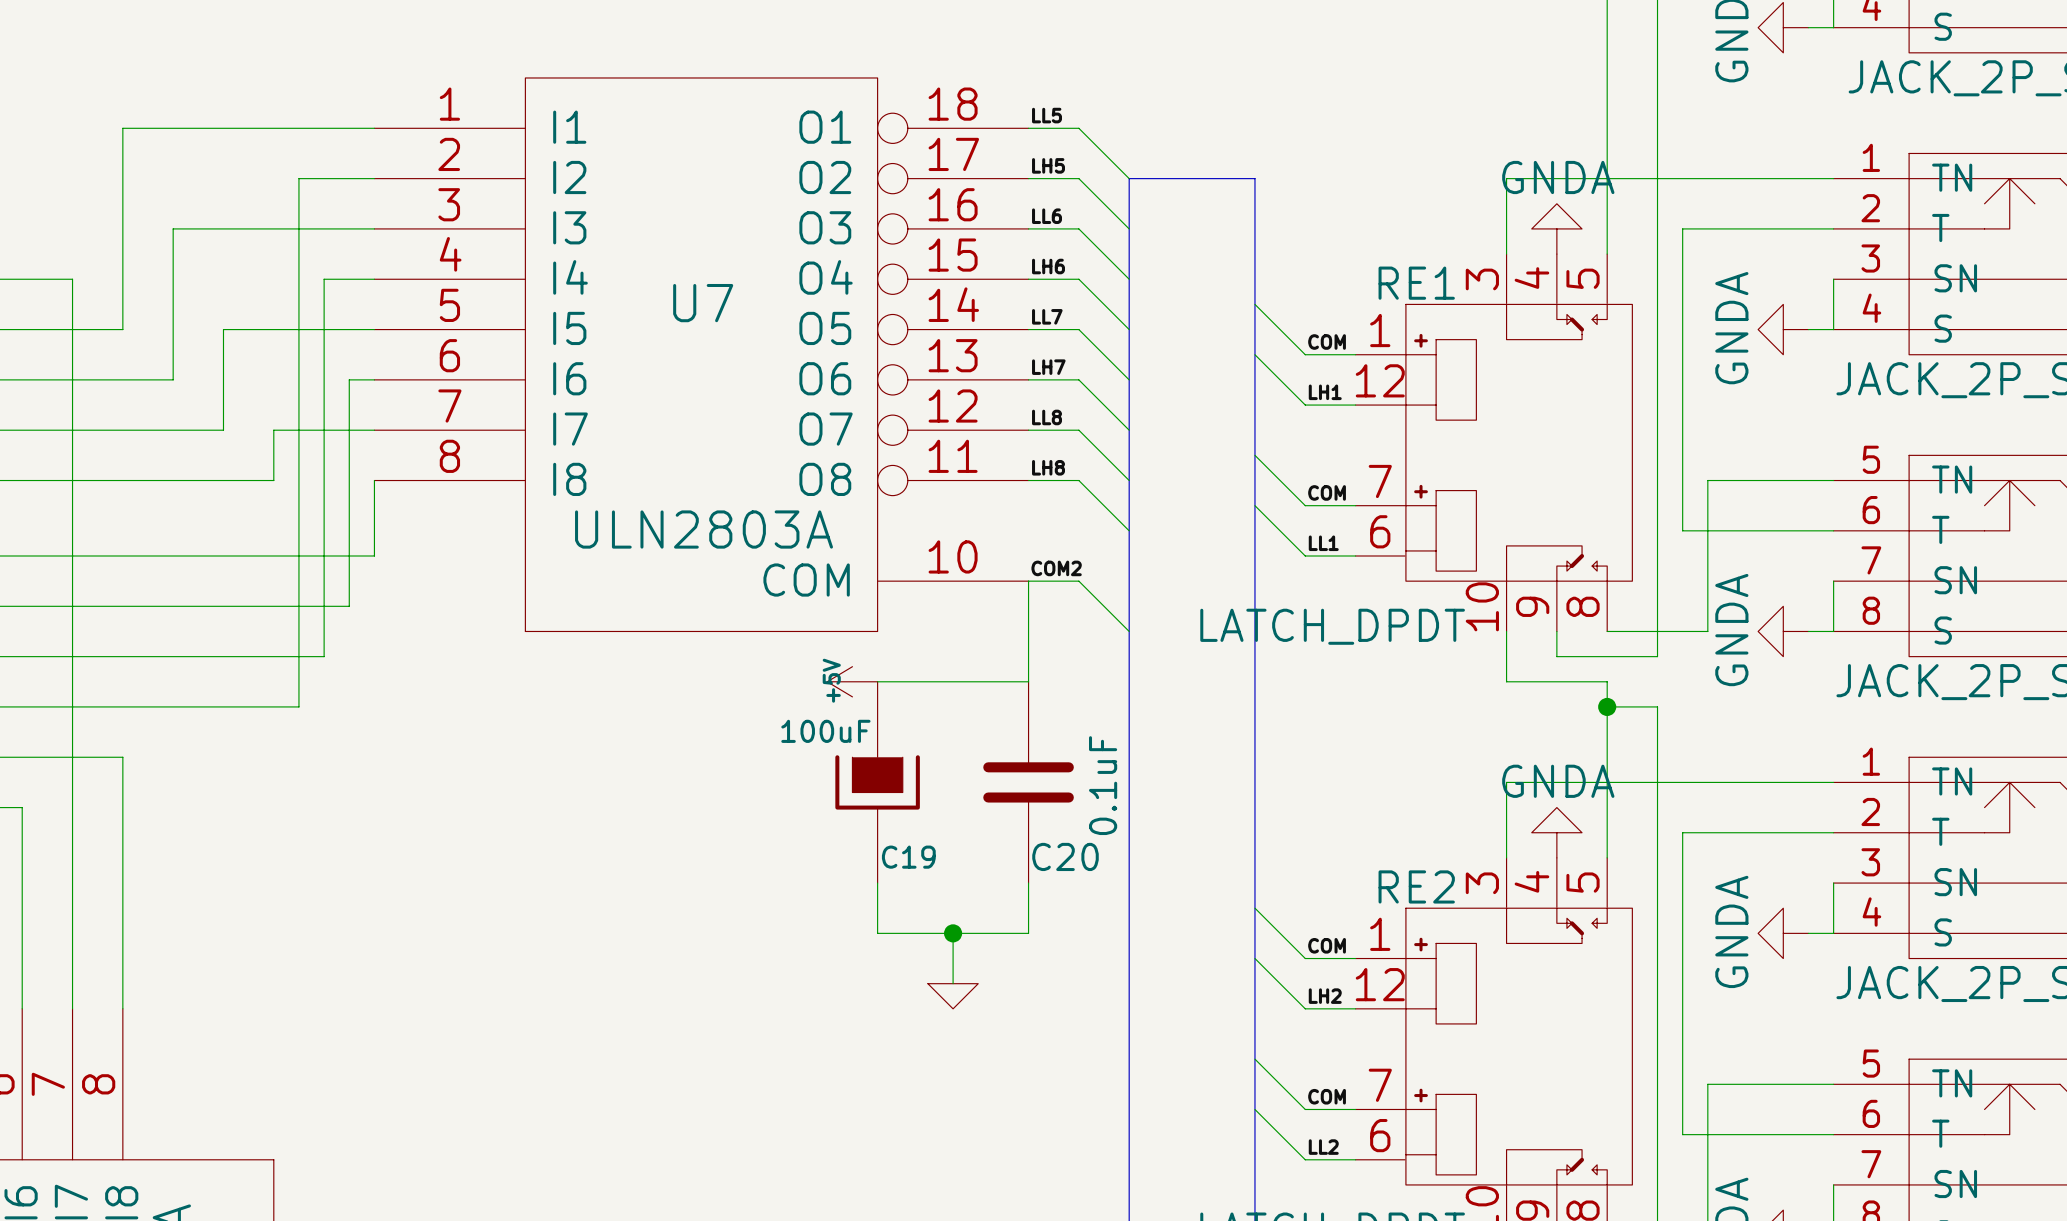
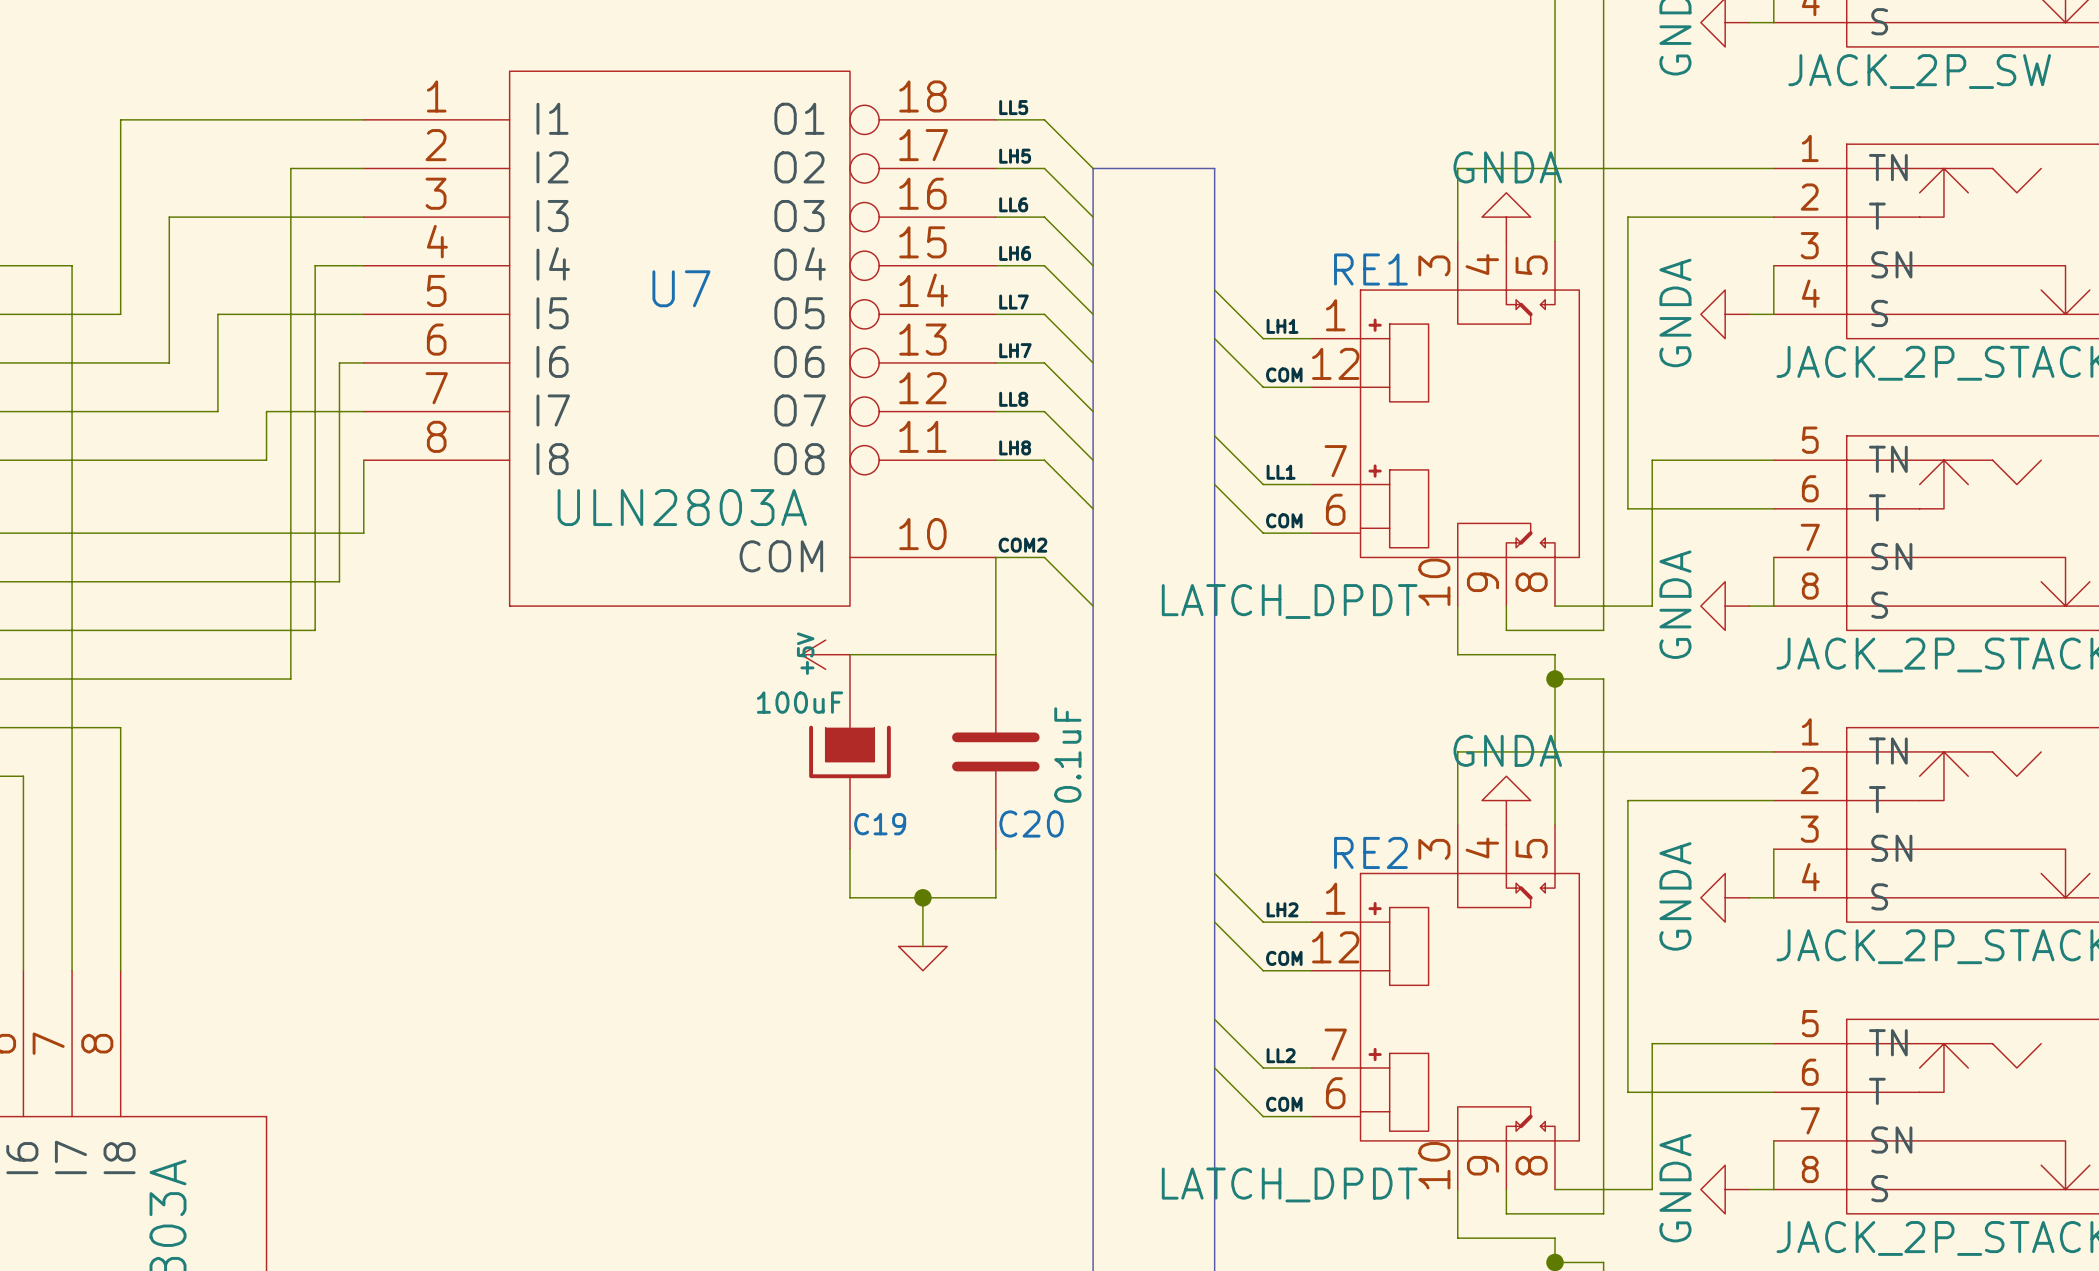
label: COM (1327, 341) -> LH1 (1282, 326)
label: LH1 (1325, 392) -> COM (1284, 374)
label: COM (1327, 492) -> LL1 (1281, 472)
label: LL1 (1323, 543) -> COM (1284, 520)
label: COM (1327, 945) -> LH2 (1282, 909)
label: LH2 (1325, 996) -> COM (1284, 958)
label: COM (1327, 1096) -> LL2 (1281, 1055)
label: LL2 (1323, 1147) -> COM (1284, 1104)

